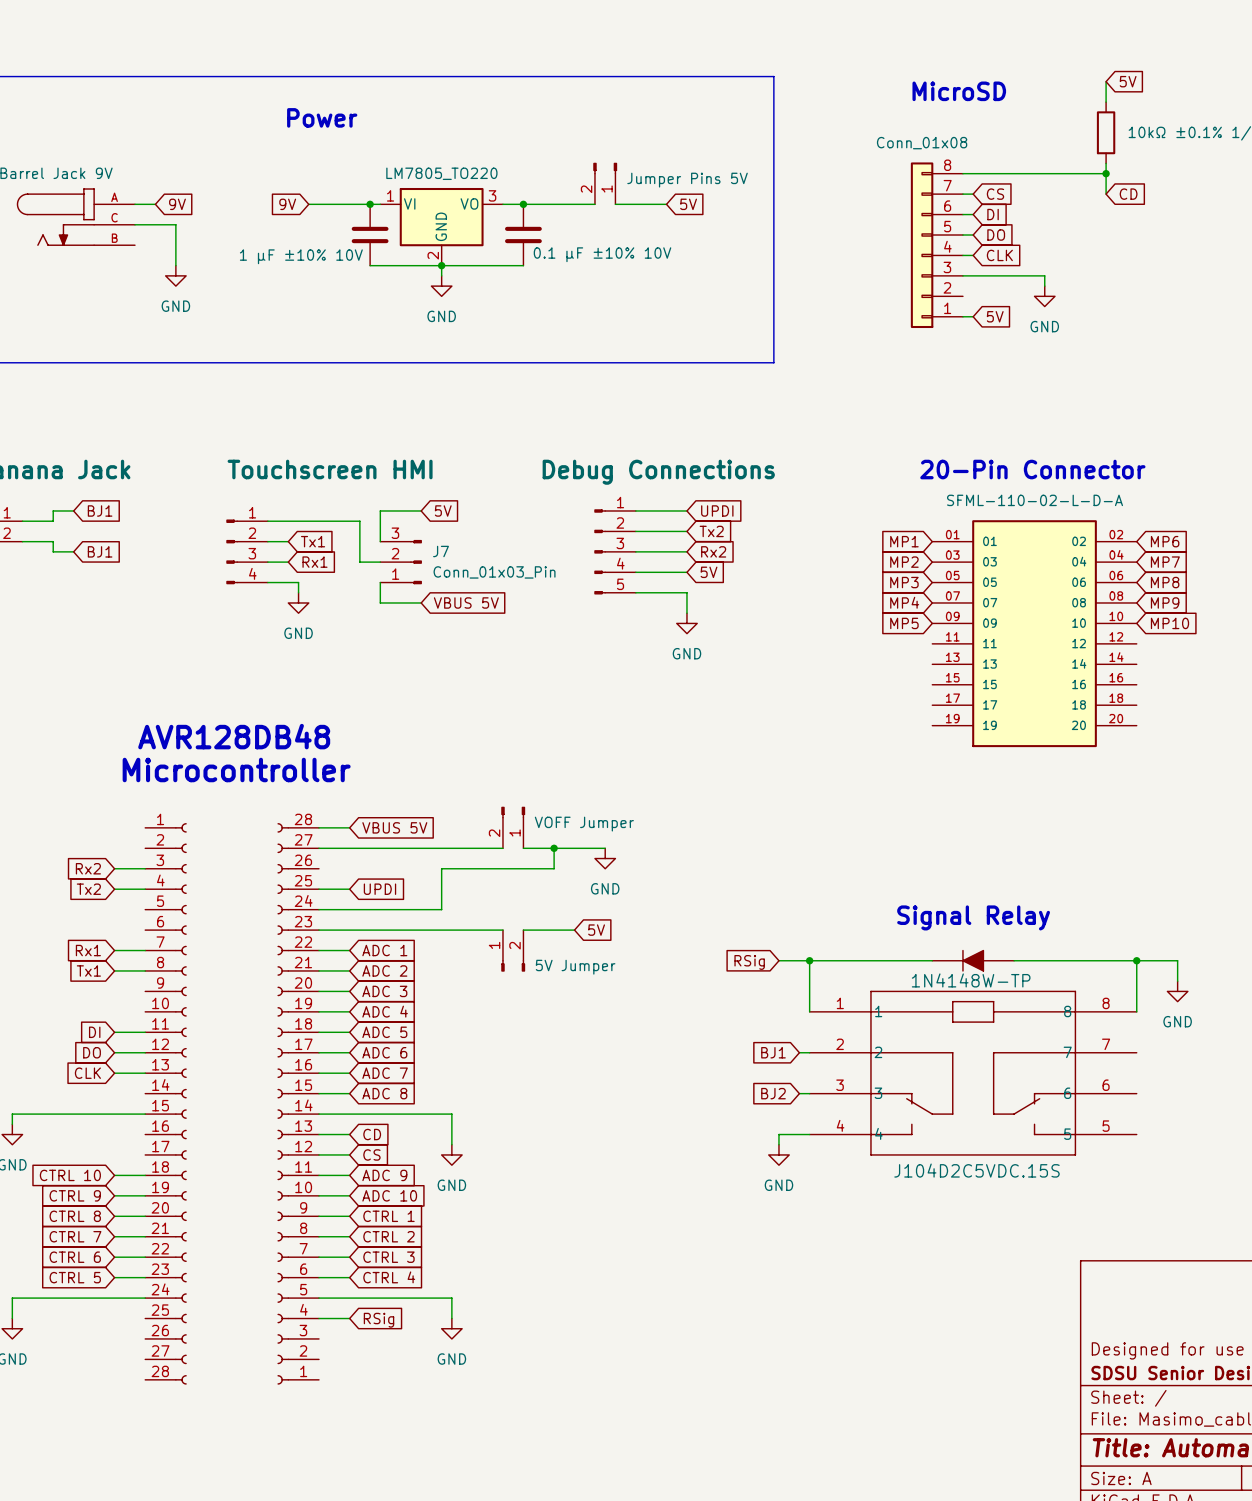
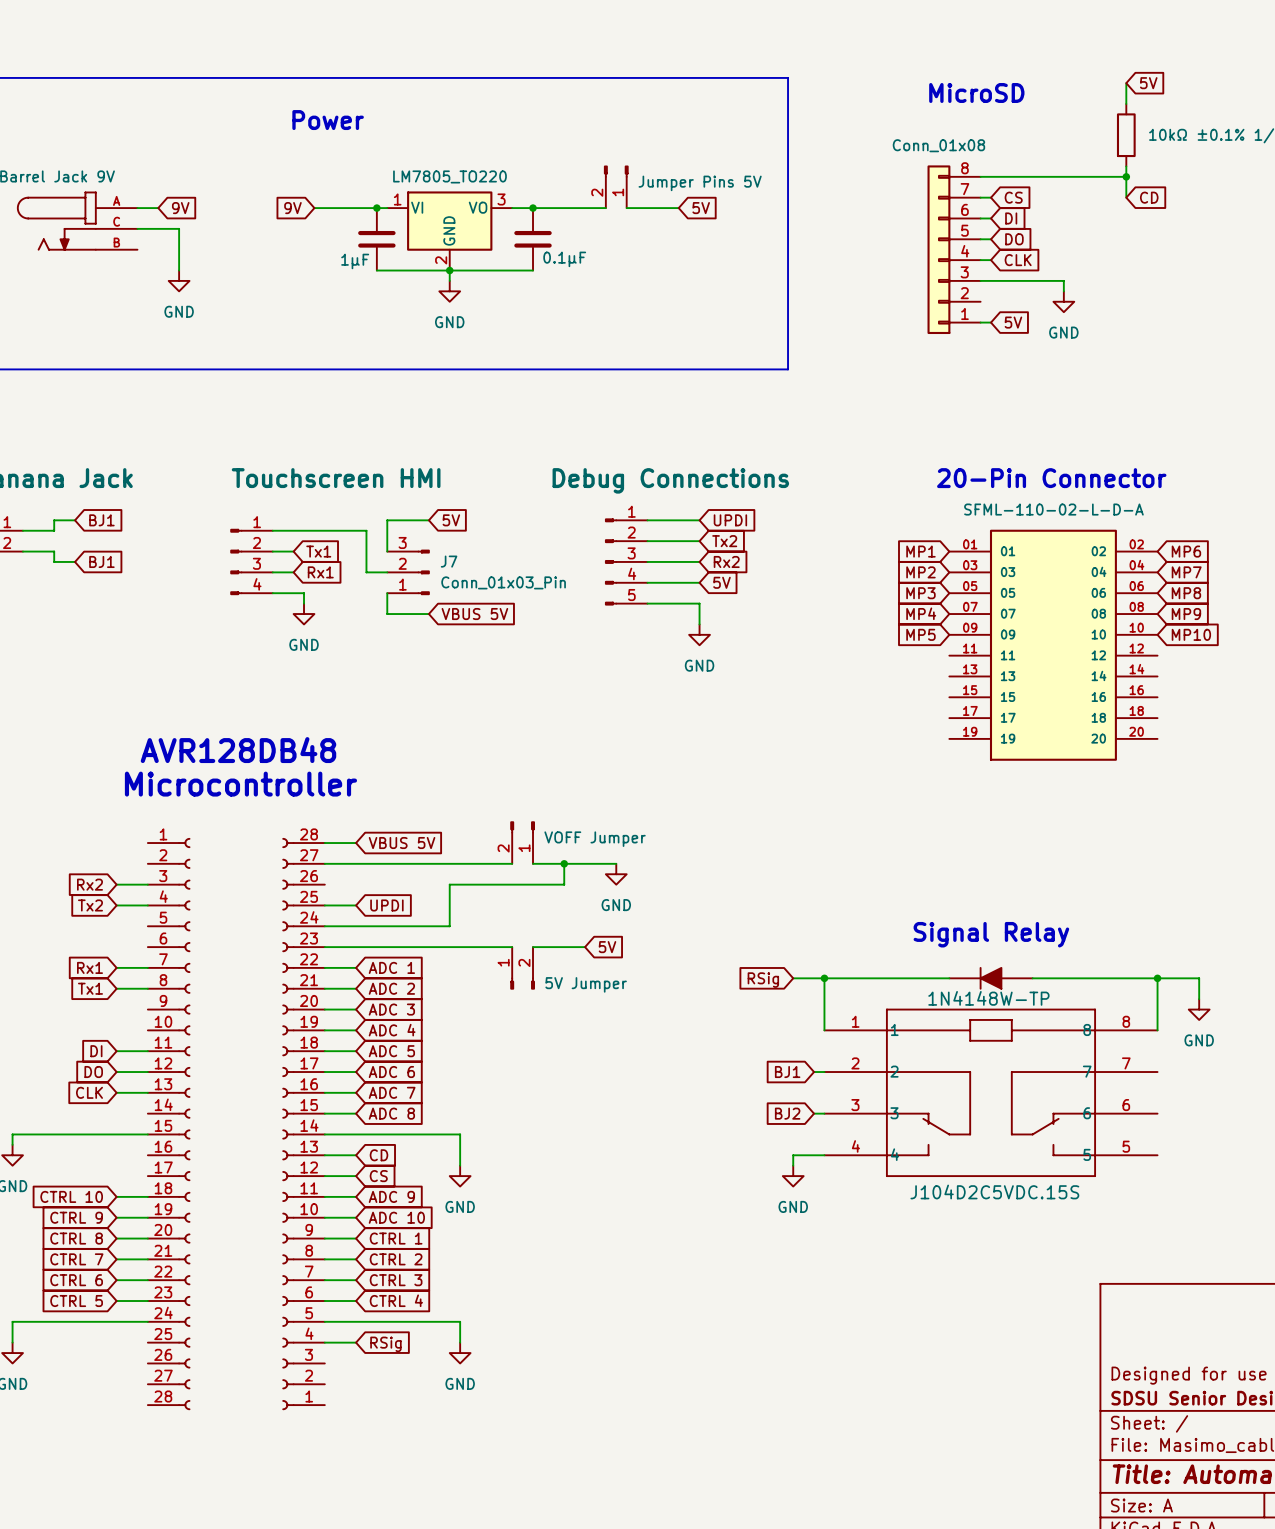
part value: 0.1 µF ±10% 10V (602, 254) -> 0.1µF (564, 259)
part value: 1 µF ±10% 10V (301, 256) -> 1µF (355, 261)

